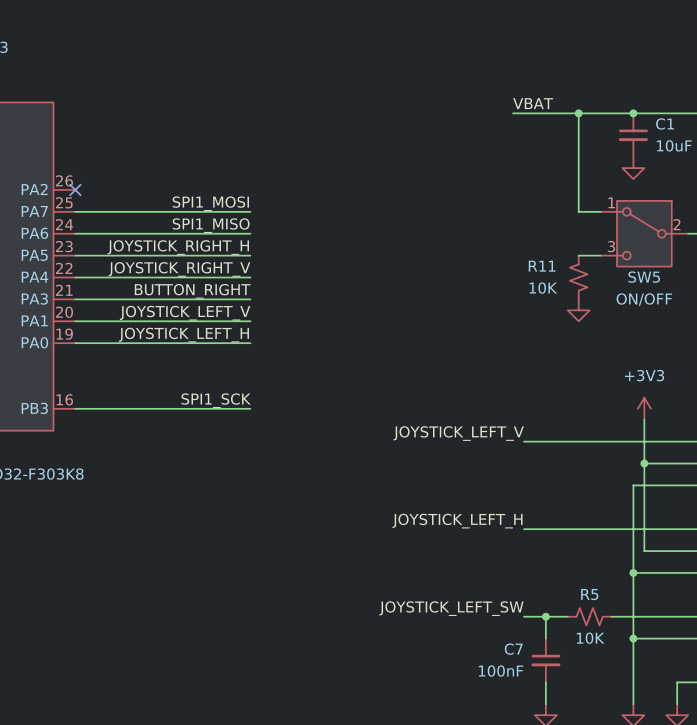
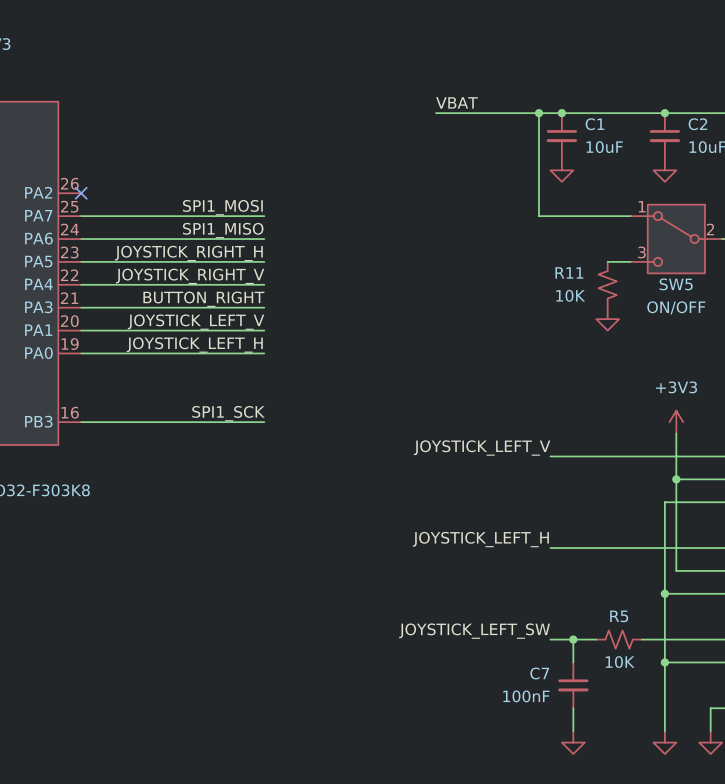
label position: VBAT (533, 103) -> VBAT (457, 102)
junction: none -> (539, 113)
junction: none -> (561, 113)
wire: (578, 113) (578, 211) -> (436, 113) (539, 113) (539, 216) (607, 216)
junction: (578, 113) -> none
C1 name: C1 (665, 123) -> C2 (697, 124)
C1: none -> 10uF (561, 136)
power symbol: none -> (561, 170)

